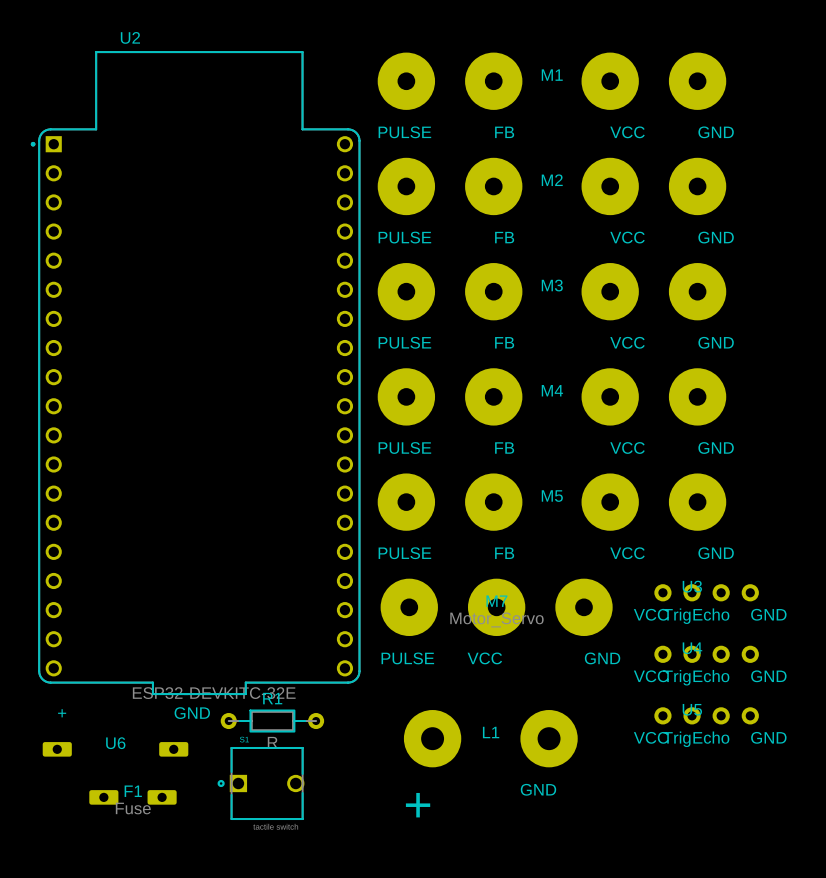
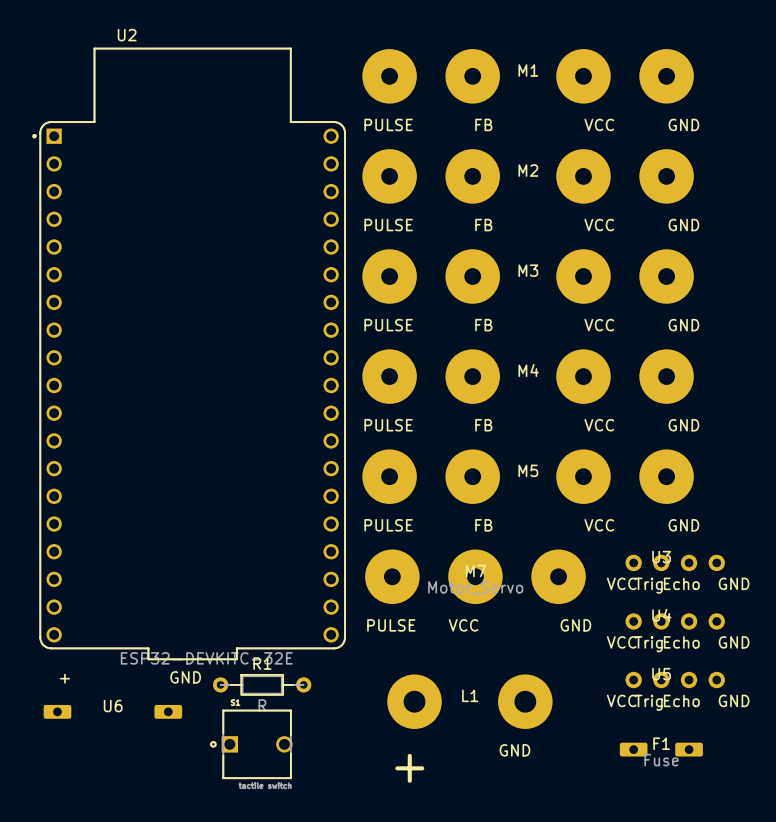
F1 position: (132, 797) -> (661, 749)

